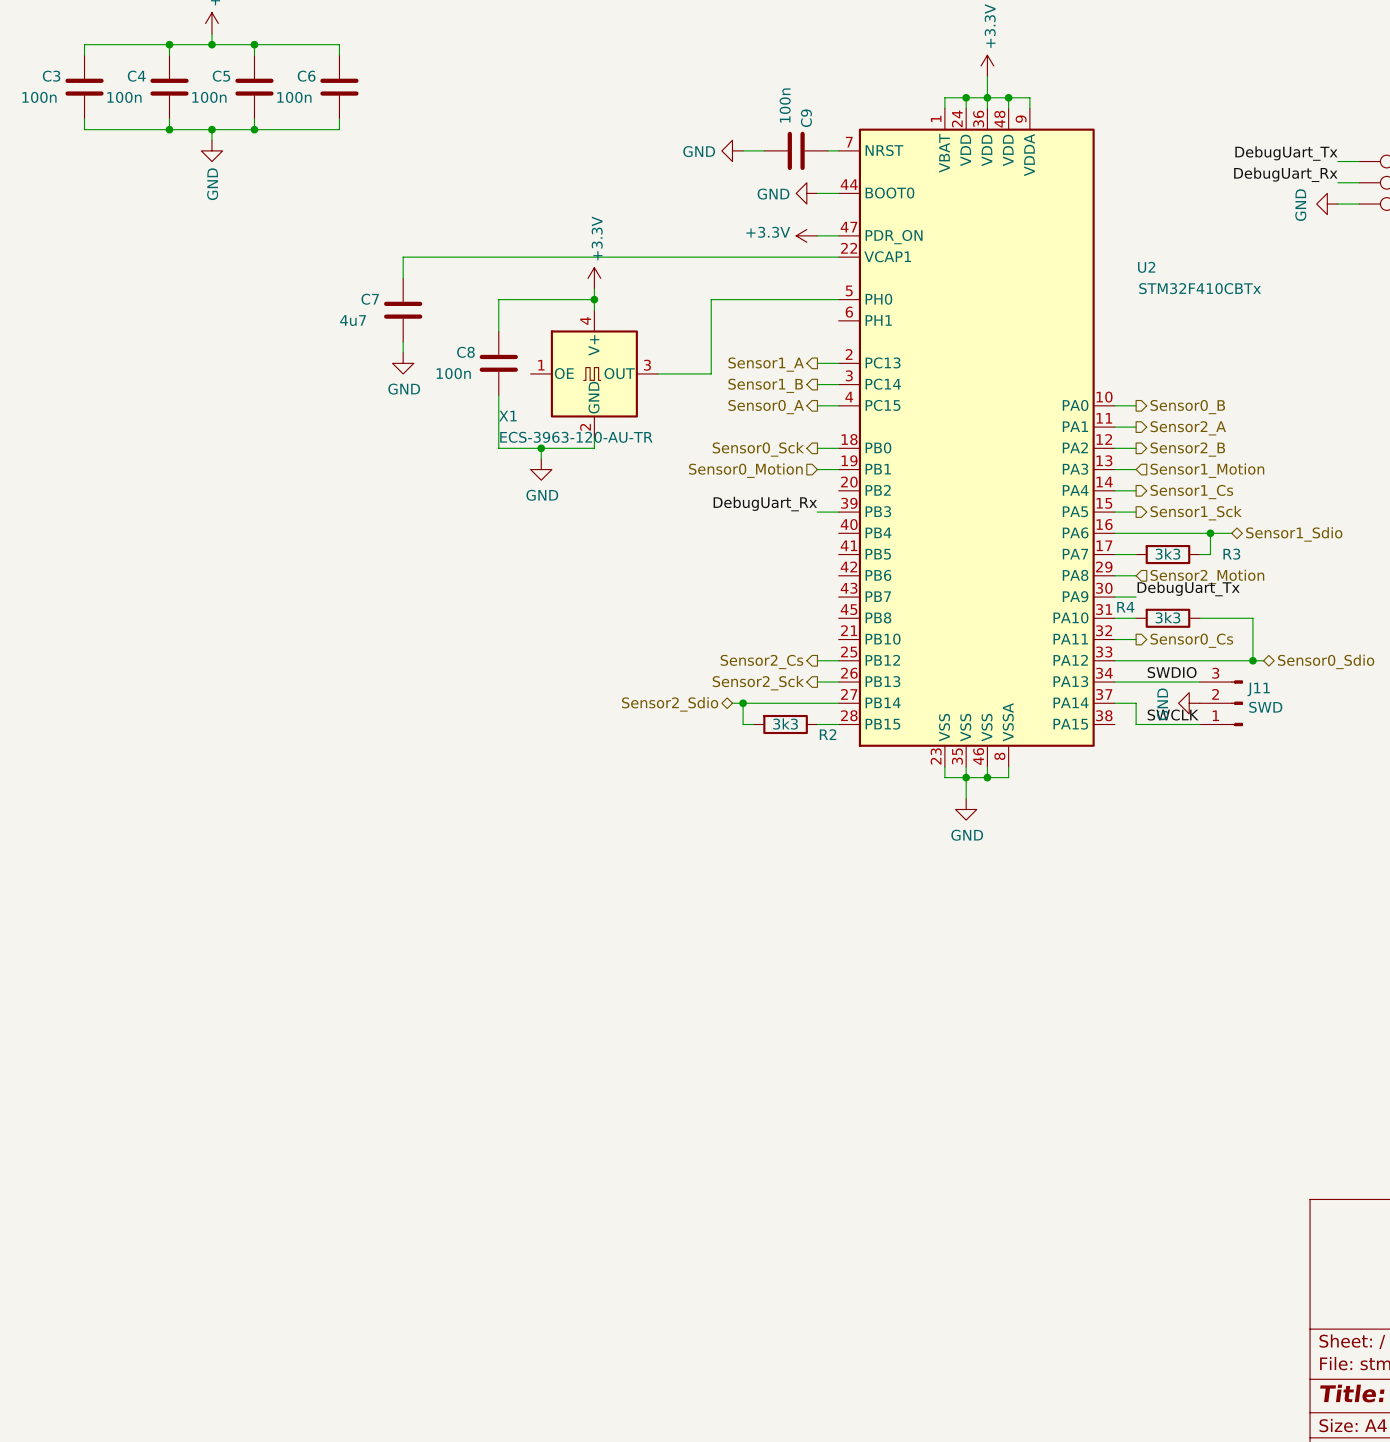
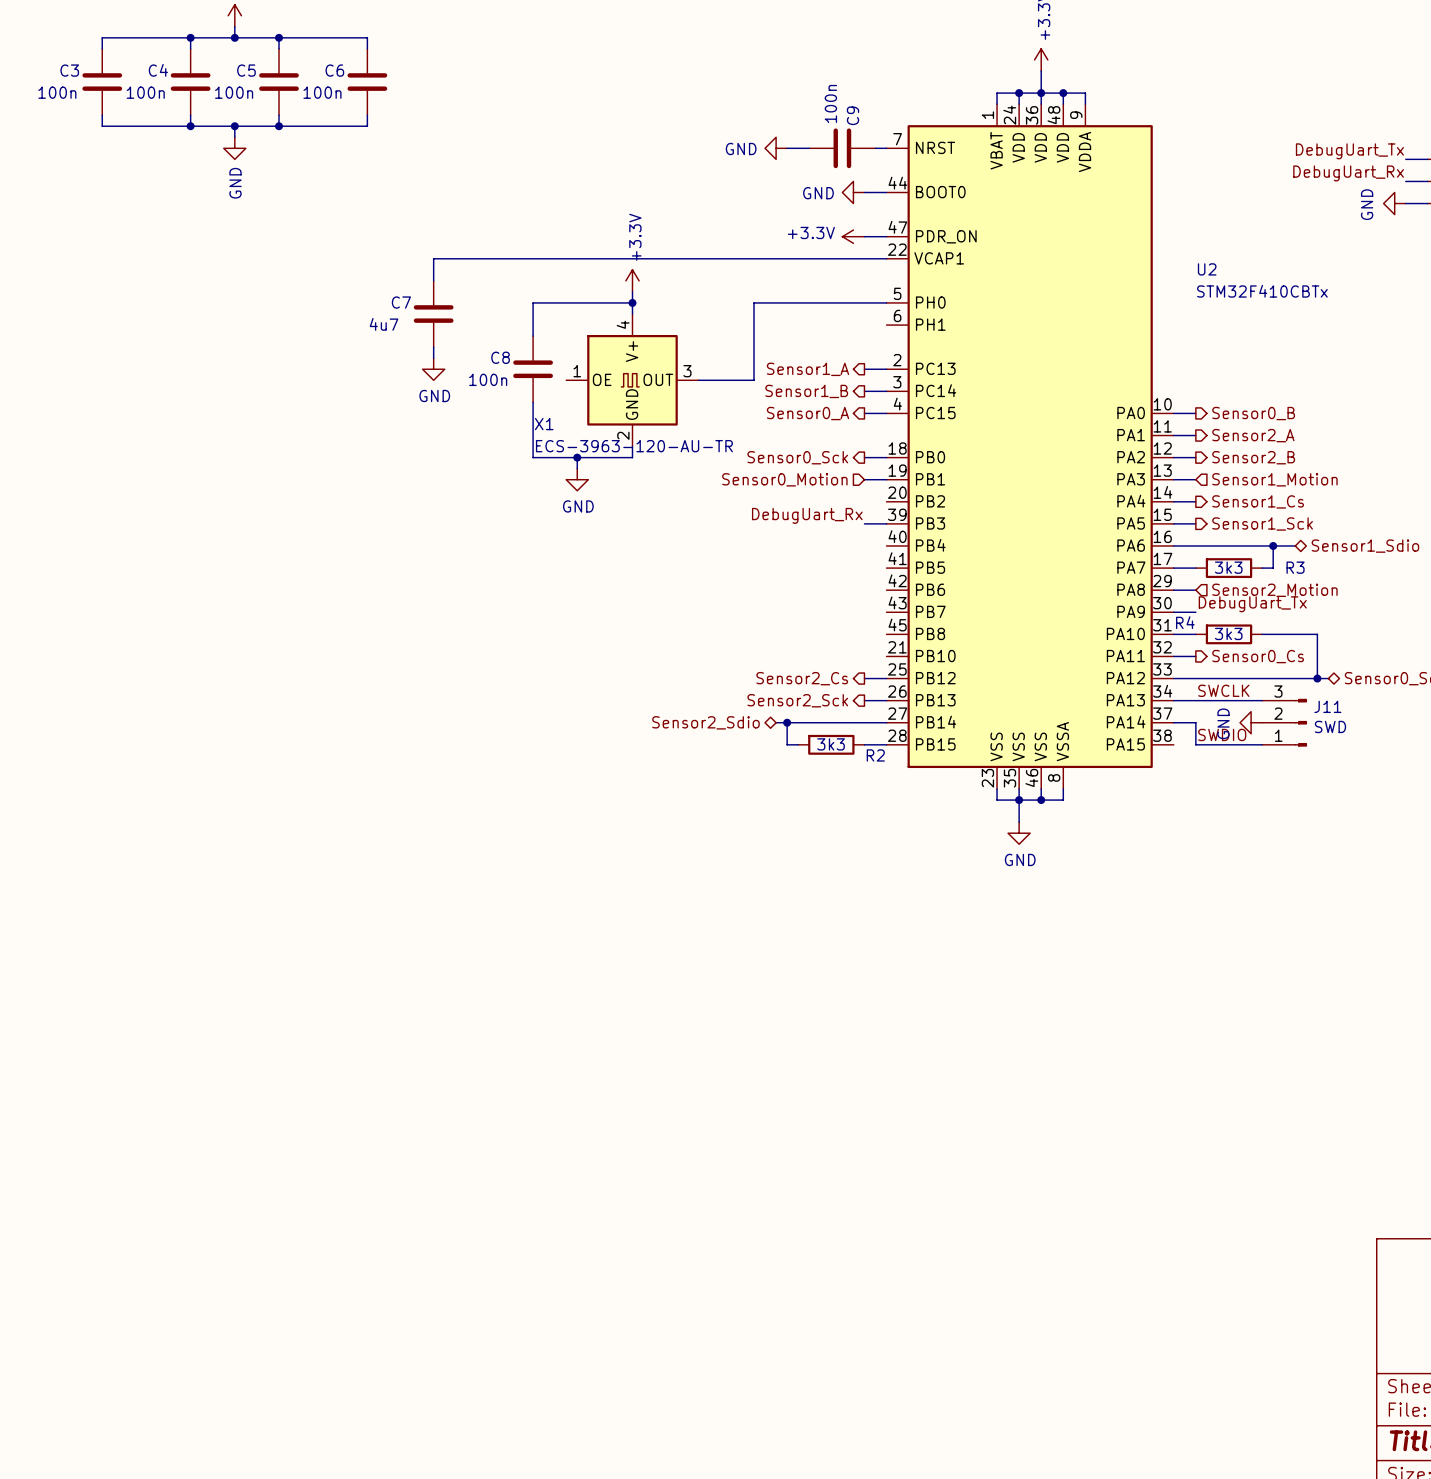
label position: SWDIO (1172, 672) -> SWDIO (1222, 734)
label position: SWCLK (1173, 715) -> SWCLK (1223, 690)

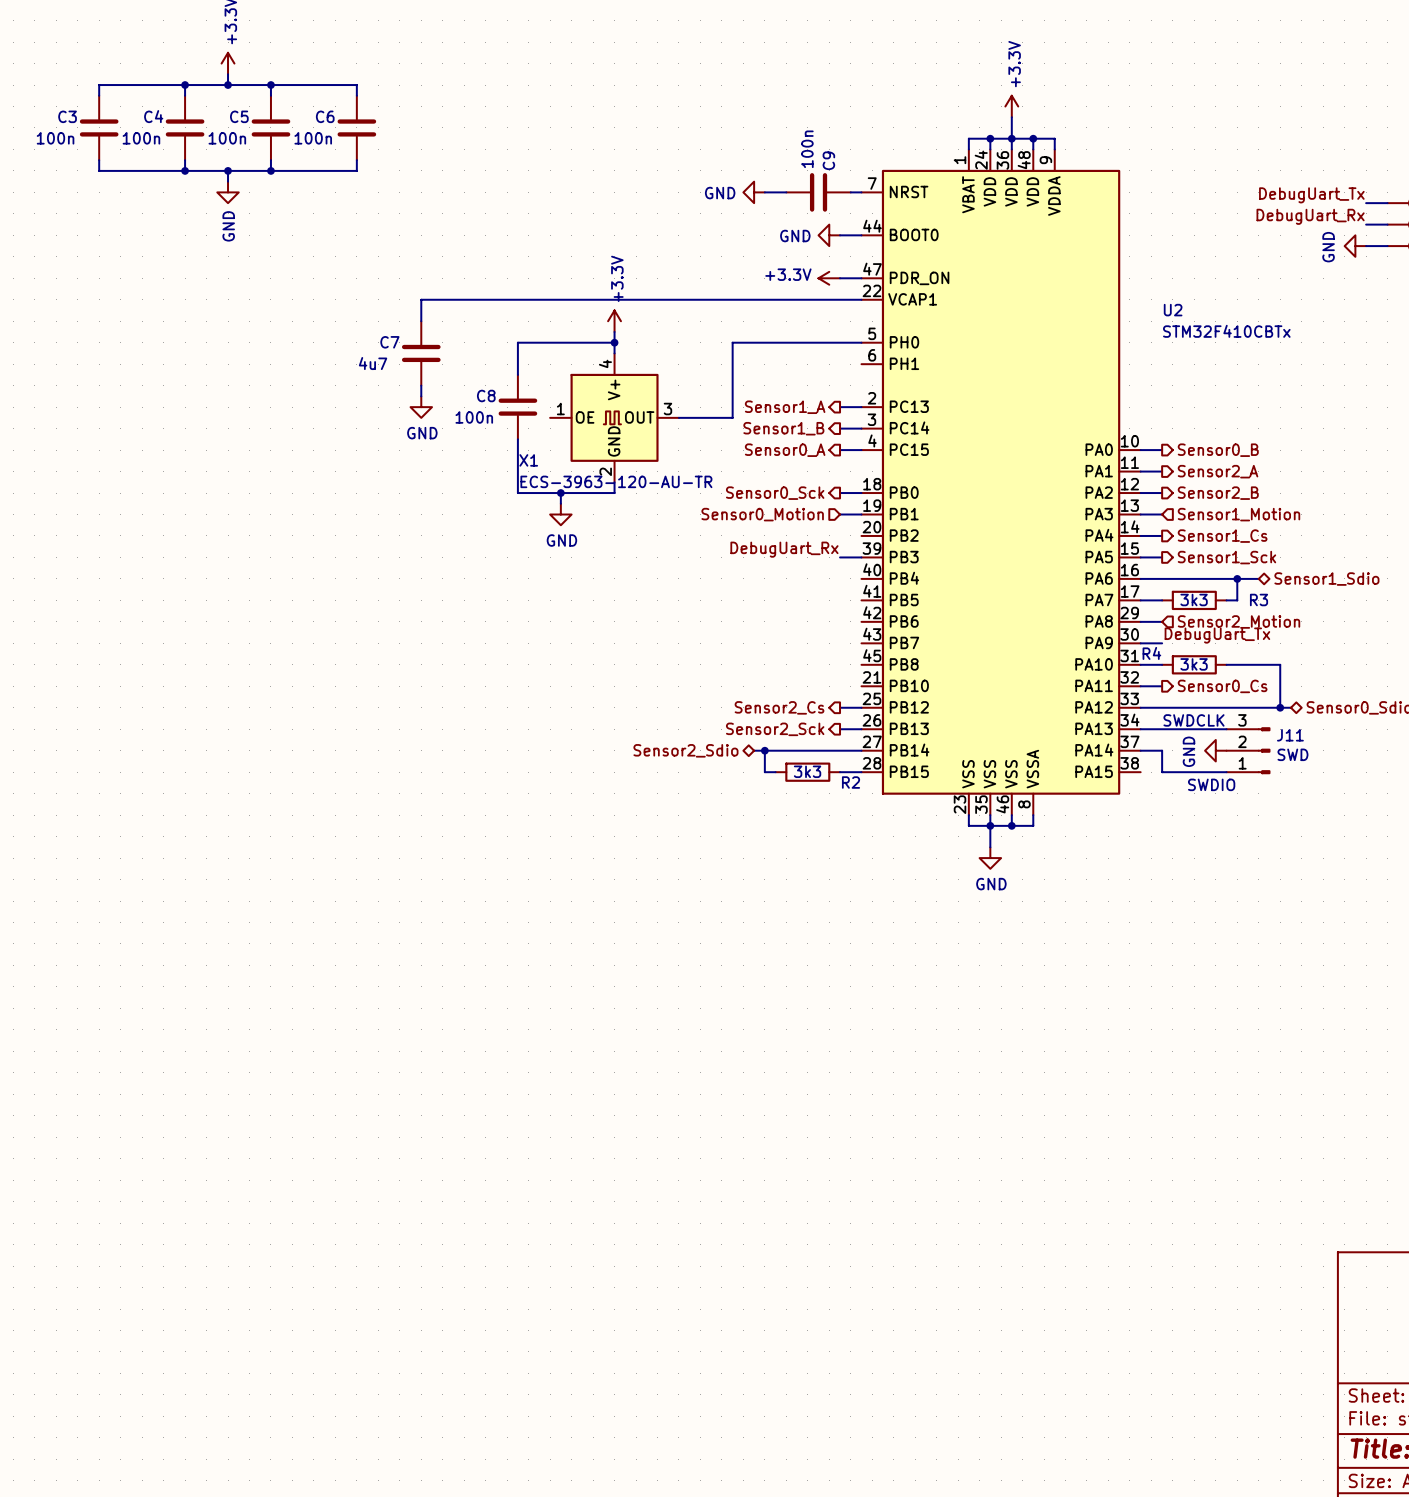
label: SWCLK (1223, 690) -> none
text: none -> SWDCLK (1194, 720)
label: SWDIO (1222, 734) -> none
text: none -> SWDIO (1211, 784)

